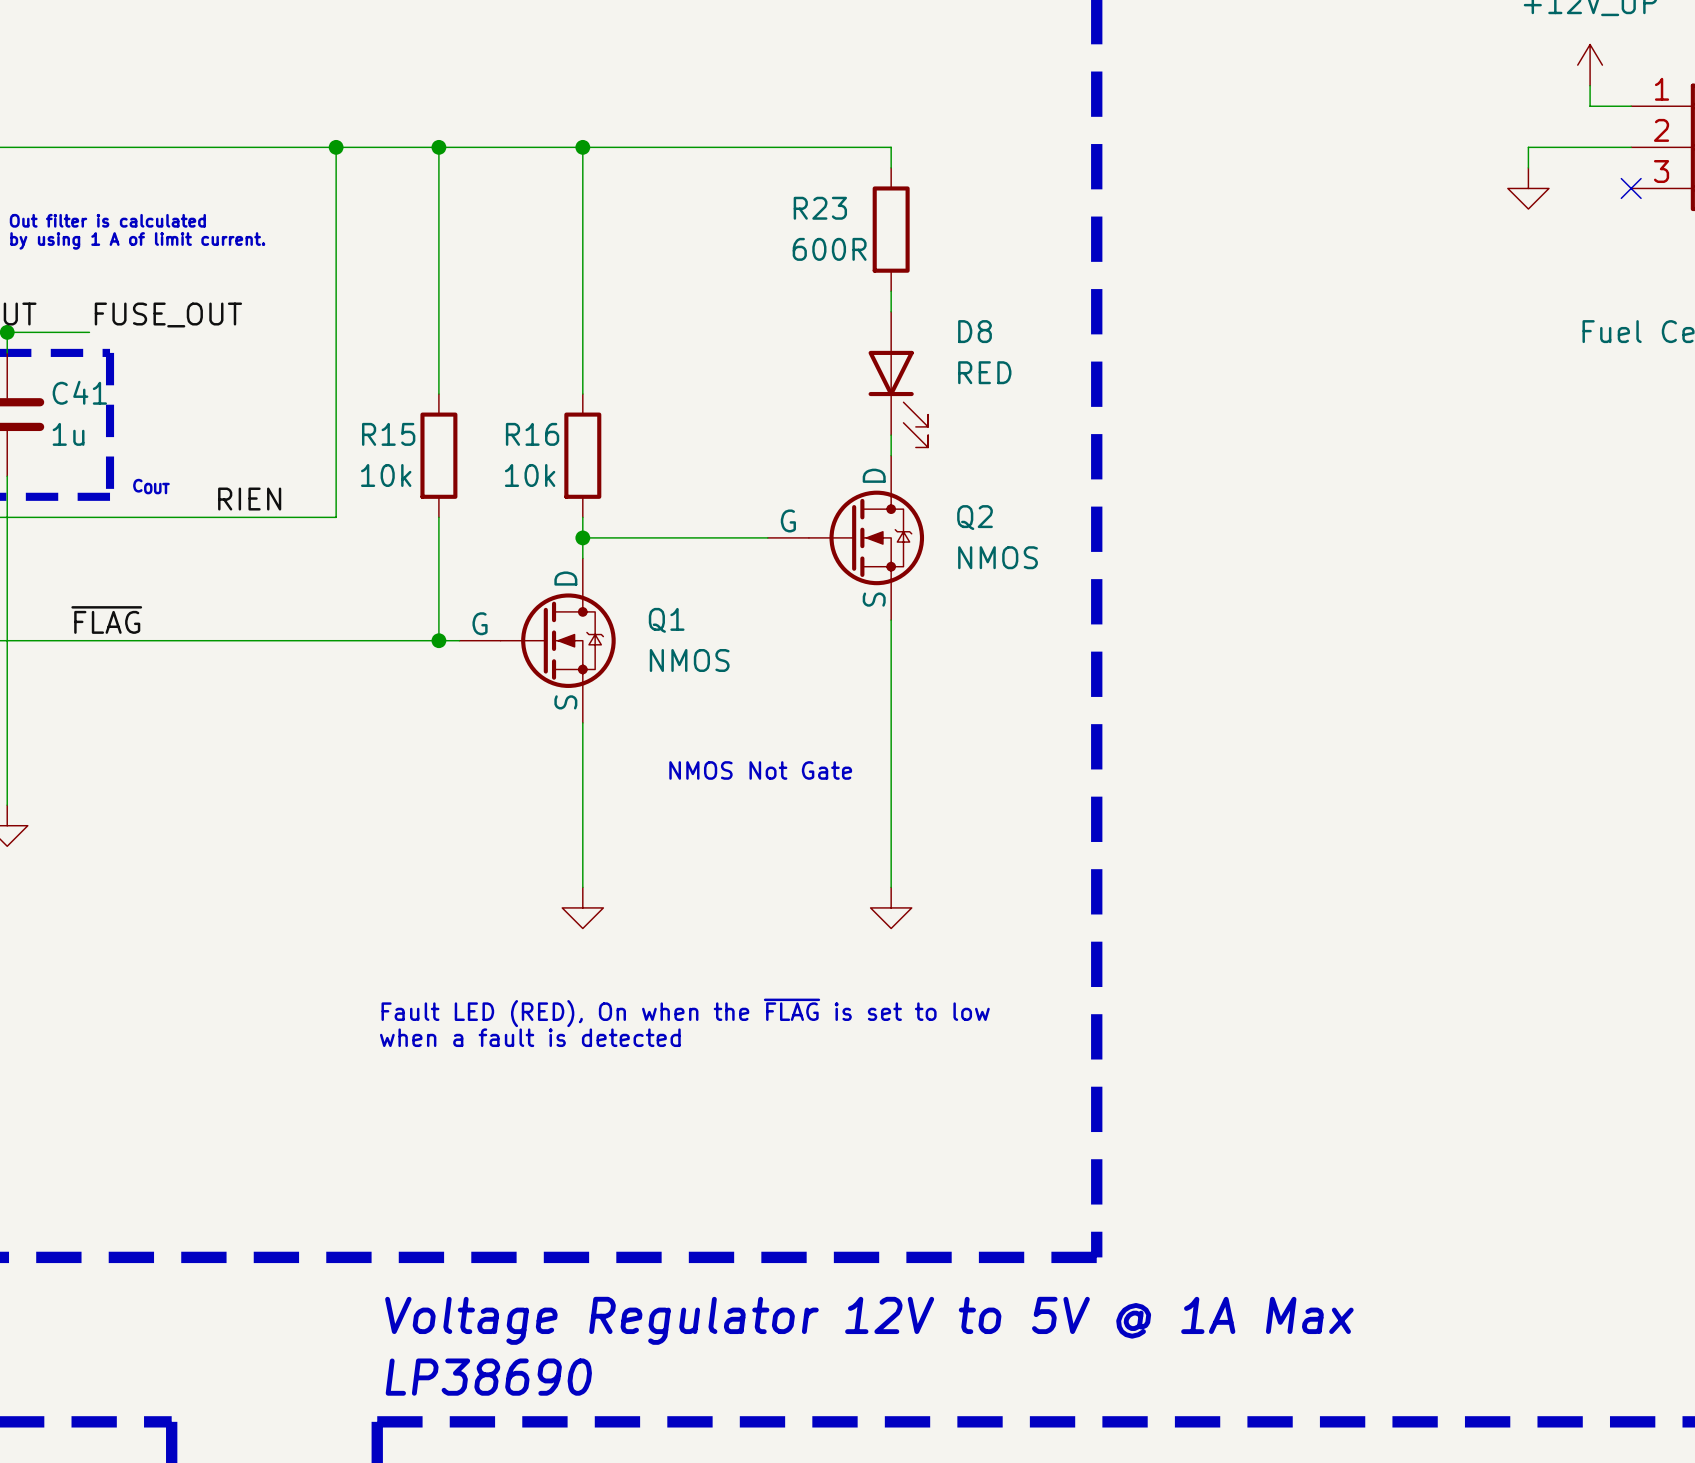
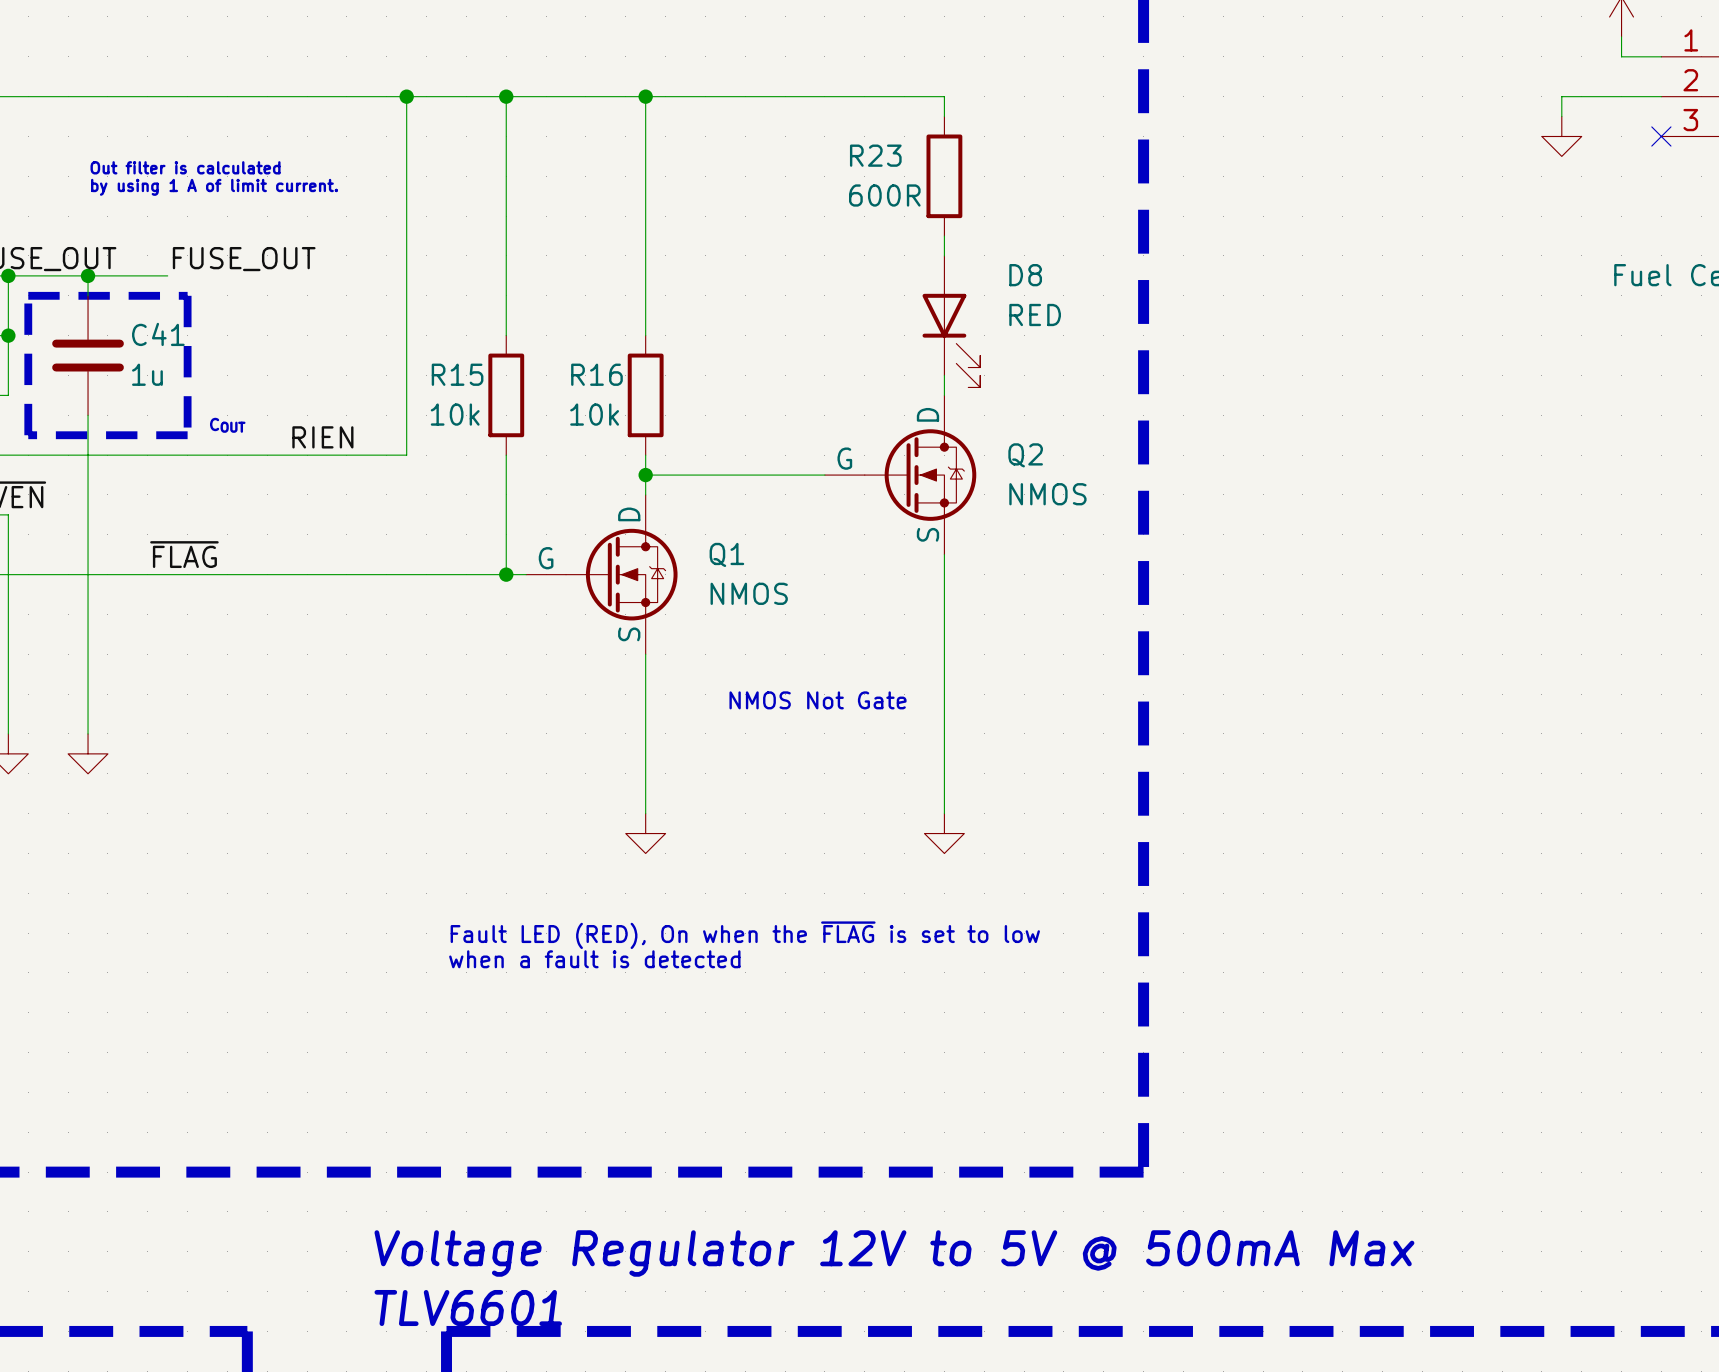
text: Voltage Regulator 12V to 5V @ 1A Max (869, 1320) -> Voltage Regulator 12V to 5V @ 500mA Max (894, 1253)
text: LP38690 (488, 1377) -> none
text: none -> TLV6601 (468, 1308)

